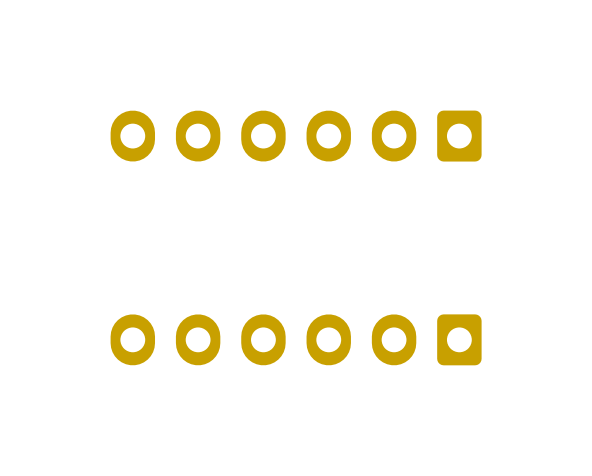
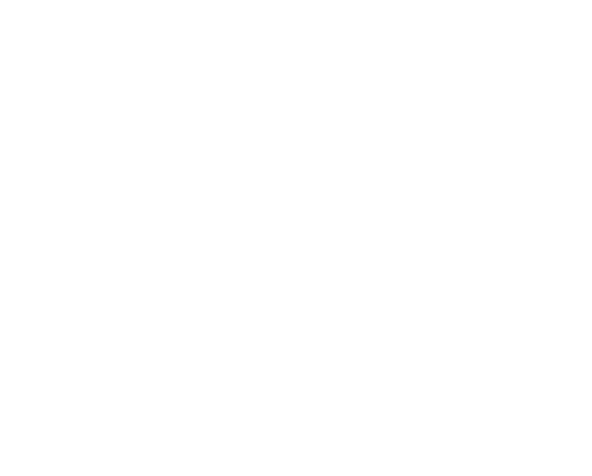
part: (296, 136) -> none
part: (296, 339) -> none

